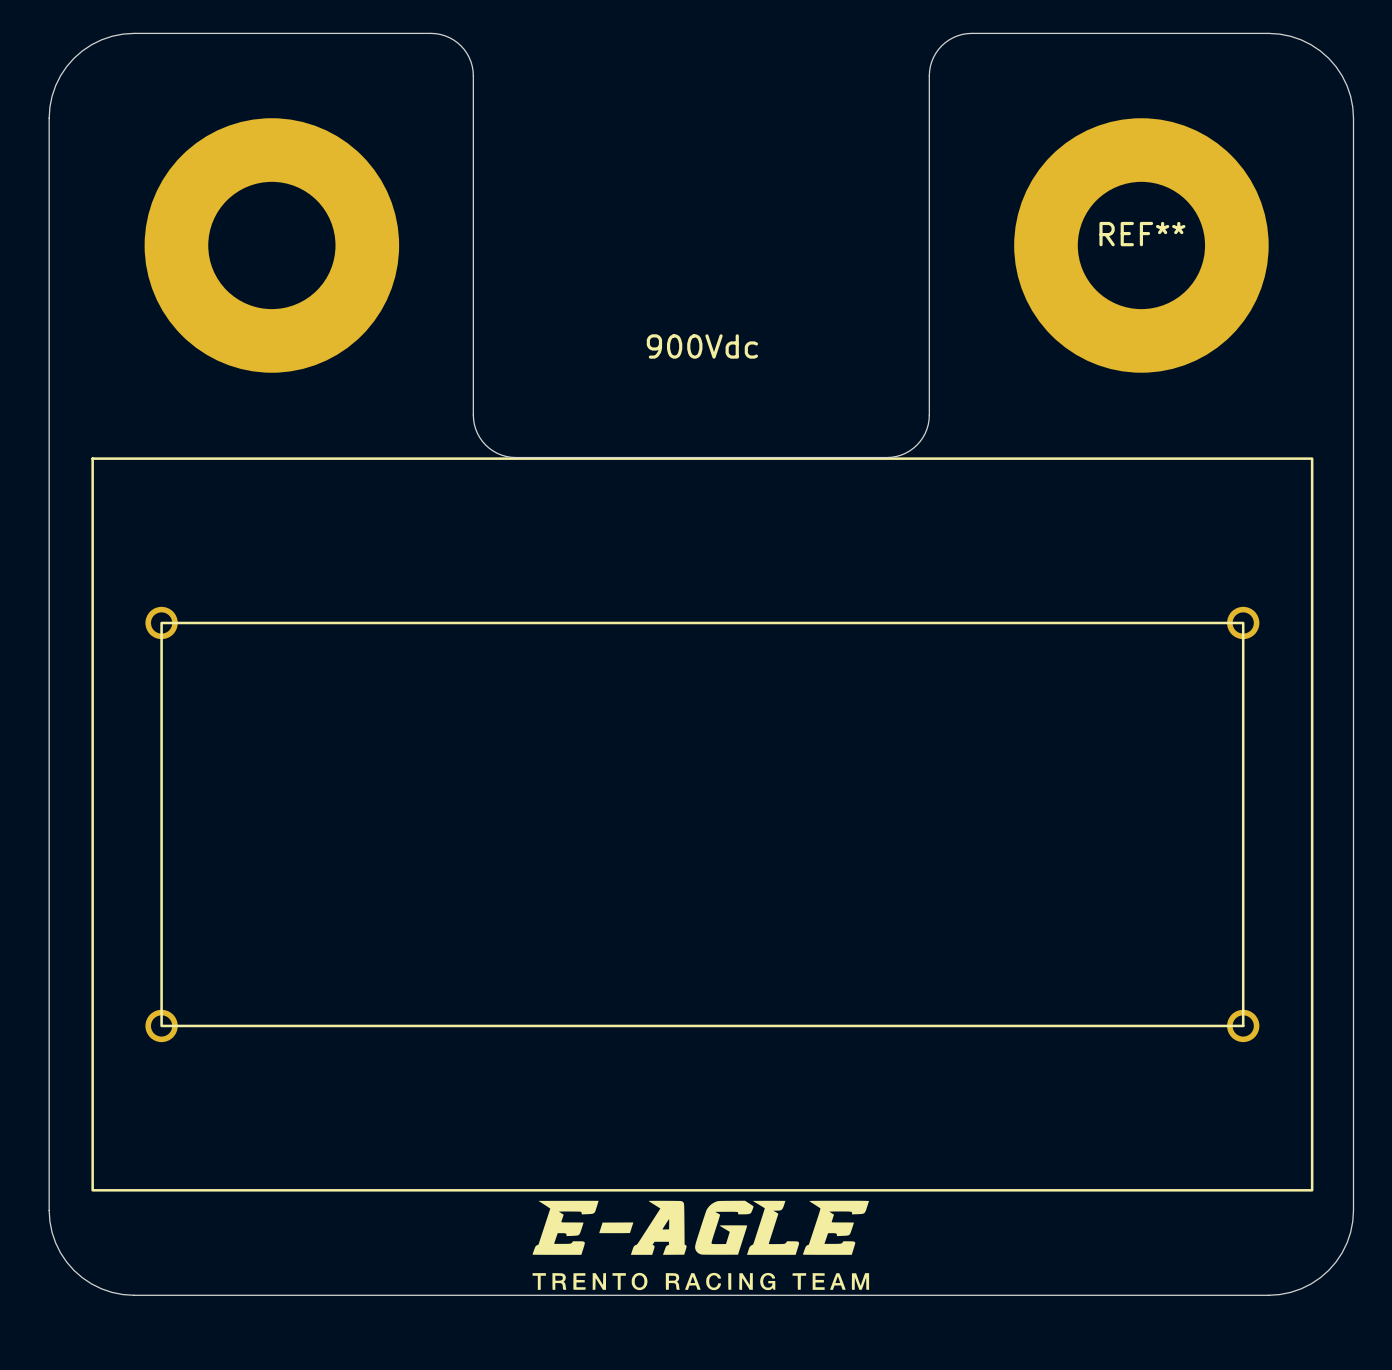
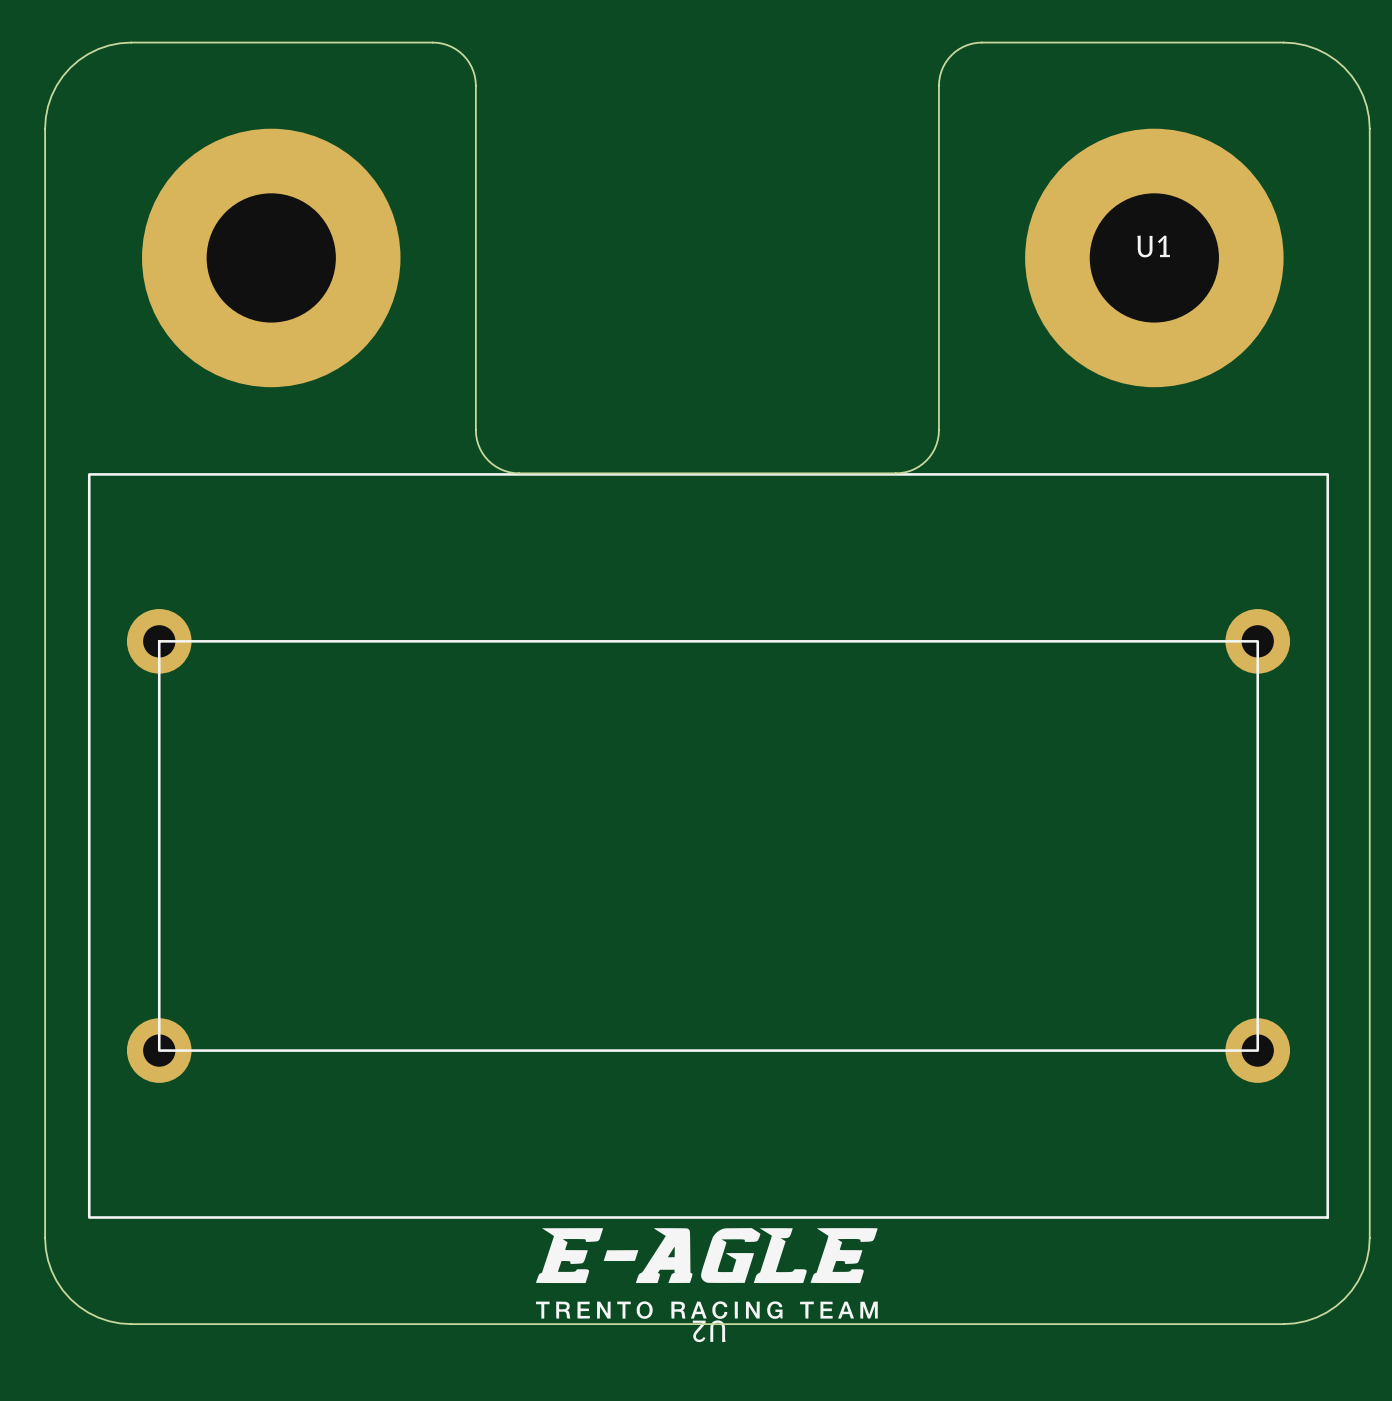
REF** name: REF** (1142, 234) -> U1 (1153, 246)
900Vdc: (702, 824) -> none
U2: none -> (708, 845)

